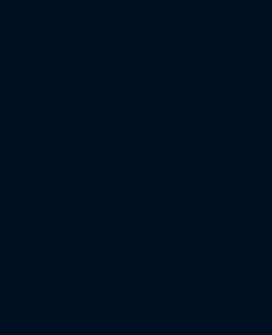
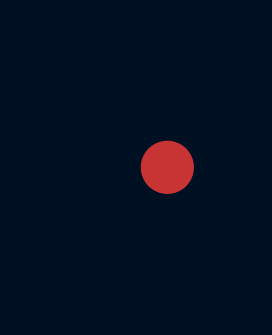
part: none -> (167, 167)

